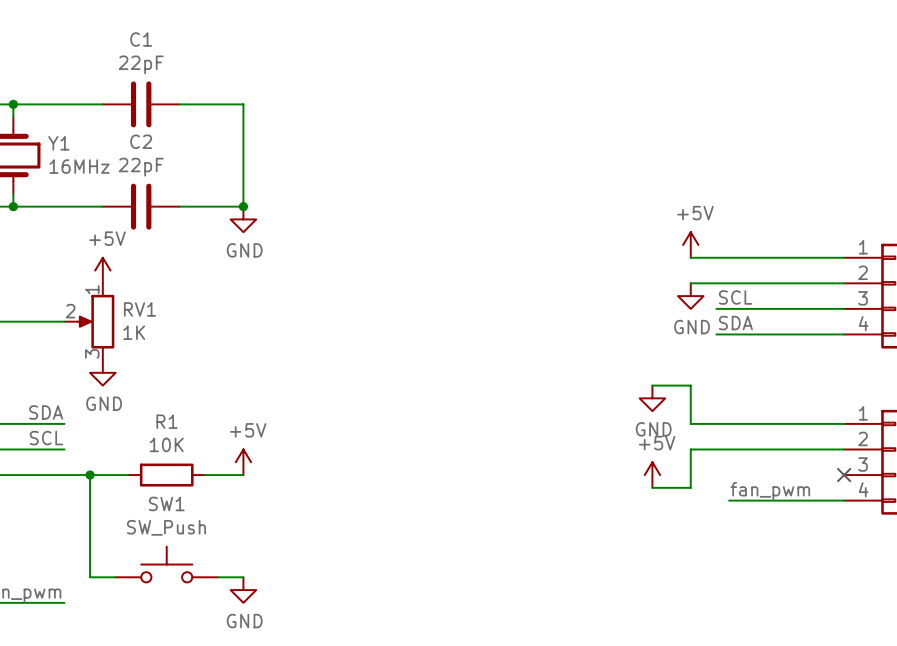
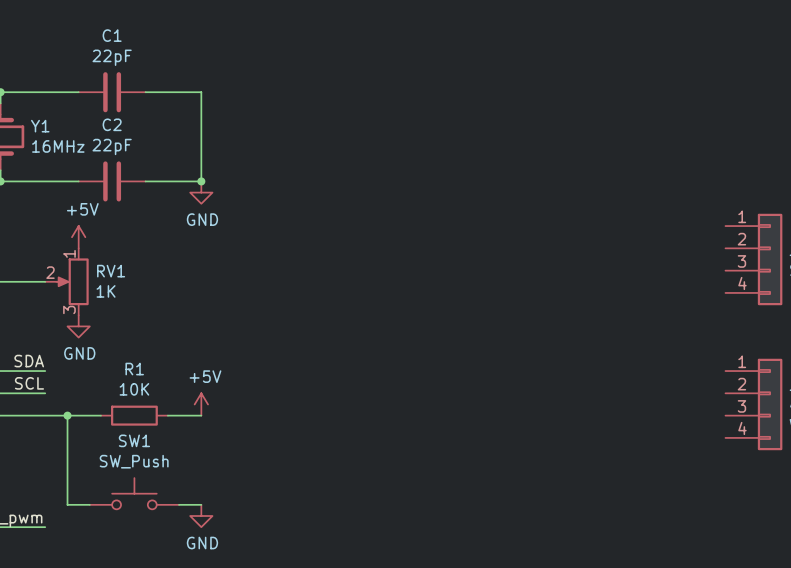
power symbol: +5V (690, 244) -> none
wire: (690, 257) (844, 257) -> none
wire: (690, 283) (844, 283) -> none
power symbol: GND (690, 296) -> none
label: SCL (735, 297) -> none
wire: (716, 308) (844, 308) -> none
label: SDA (735, 323) -> none
wire: (716, 334) (844, 334) -> none
wire: (652, 385) (690, 385) (690, 423) (844, 423) -> none
power symbol: GND (652, 398) -> none
wire: (844, 449) (690, 449) (690, 487) (652, 487) -> none
power symbol: +5V (652, 475) -> none
no-connect mark: (844, 475) -> none
label: fan_pwm (770, 491) -> none
wire: (729, 500) (844, 500) -> none

